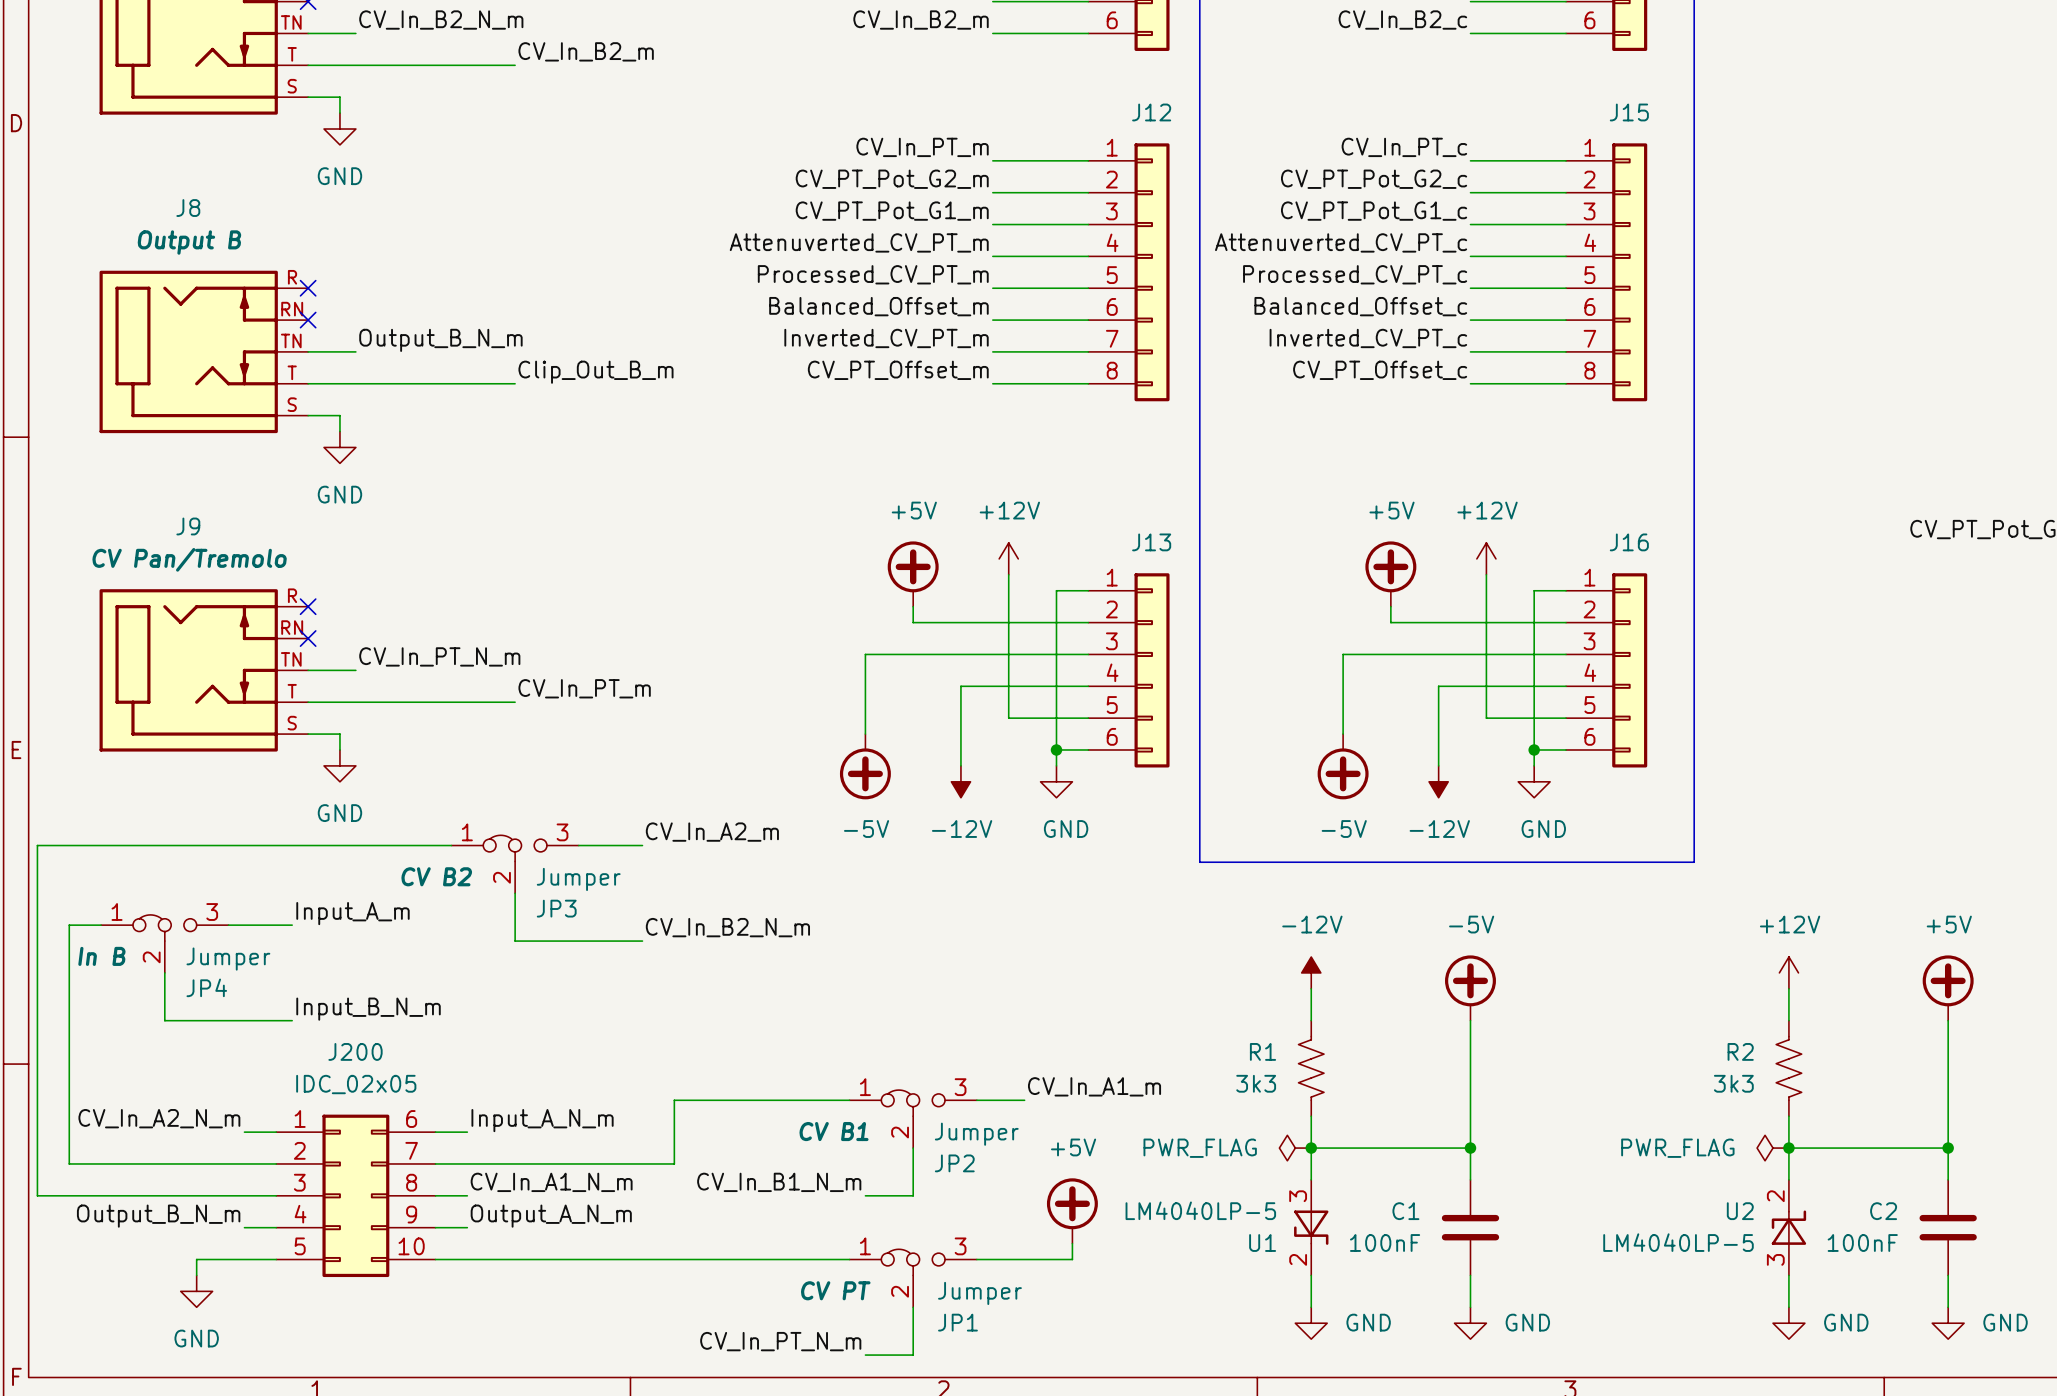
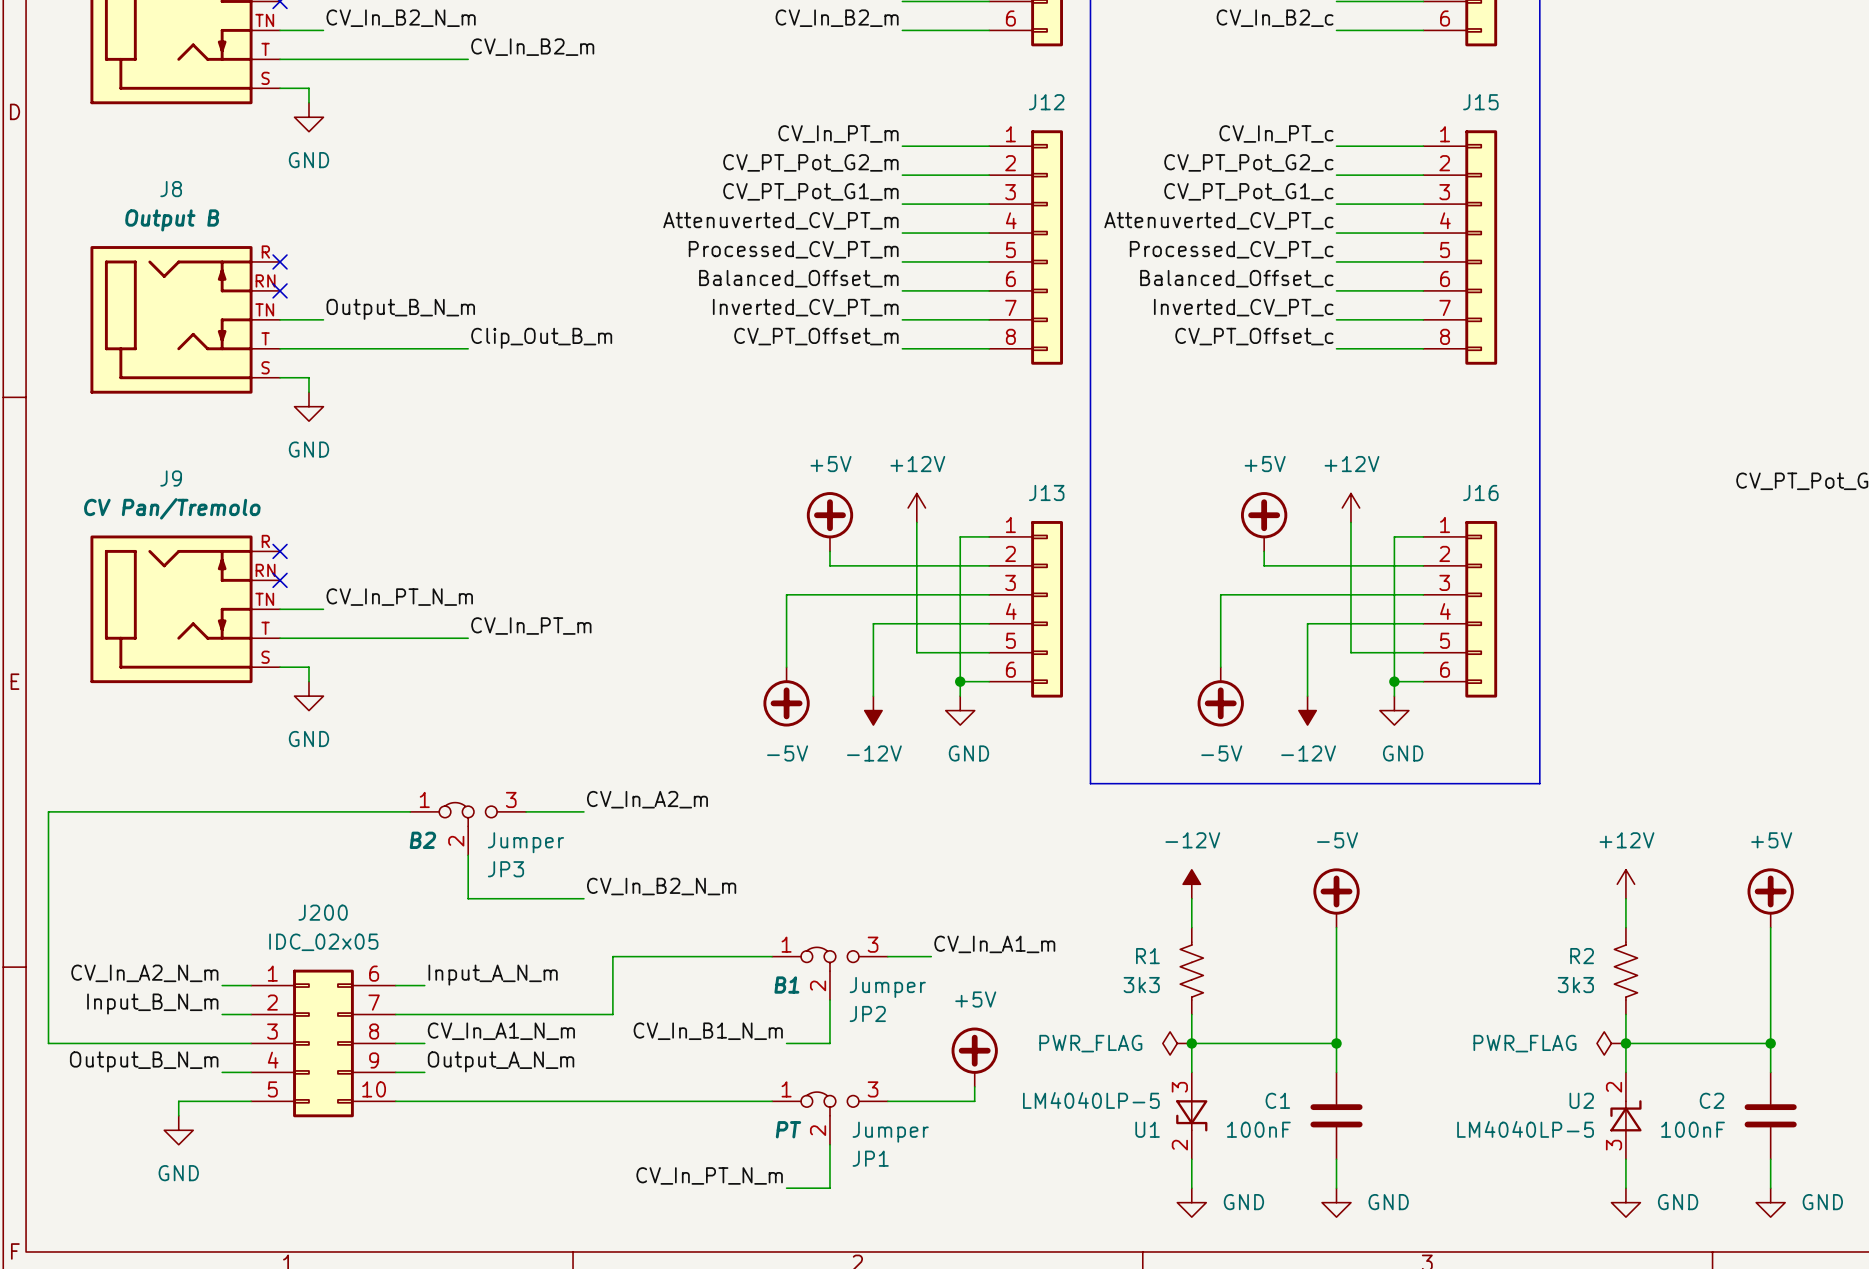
label position: CV_In_A2_m (712, 832) -> CV_In_A2_m (647, 799)
wire: (451, 845) (37, 845) (37, 1195) (276, 1195) -> none
wire: (578, 845) (642, 845) -> (526, 811) (583, 811)
JP3 position: (515, 864) -> (468, 828)
JP3 text: CV B2 (436, 876) -> B2 (422, 840)
wire: none -> (410, 811) (48, 811) (48, 1043) (251, 1043)
wire: (515, 893) (515, 941) (642, 941) -> (468, 855) (468, 898) (583, 898)
label: Input_A_m (352, 913) -> none
wire: (101, 925) (69, 925) (69, 1163) (276, 1163) -> none
wire: (228, 925) (292, 925) -> none
label position: CV_In_B2_N_m (727, 927) -> CV_In_B2_N_m (661, 886)
JP4: Jumper (164, 943) -> none
wire: (164, 972) (164, 1020) (292, 1020) -> none
label position: Input_B_N_m (368, 1009) -> Input_B_N_m (152, 1004)
label position: CV_In_A1_m (1094, 1086) -> CV_In_A1_m (994, 944)
wire: (674, 1100) (849, 1100) -> (612, 1000) (612, 956) (772, 956)
wire: (976, 1100) (1024, 1100) -> (887, 956) (931, 956)
wire: none -> (222, 1014) (251, 1014)
wire: (674, 1116) (674, 1163) (435, 1163) -> (612, 1014) (395, 1014)
label position: CV_In_A2_N_m (159, 1118) -> CV_In_A2_N_m (144, 973)
JP2 position: (913, 1119) -> (829, 973)
label position: Input_A_N_m (542, 1120) -> Input_A_N_m (493, 975)
JP2 text: CV B1 (834, 1131) -> B1 (786, 985)
wire: (244, 1132) (276, 1132) -> (222, 985) (251, 985)
wire: (435, 1132) (467, 1132) -> (395, 985) (424, 985)
wire: (913, 1148) (913, 1195) (865, 1195) -> (829, 1000) (829, 1043) (786, 1043)
label position: CV_In_A1_N_m (551, 1182) -> CV_In_A1_N_m (501, 1031)
label position: CV_In_B1_N_m (779, 1182) -> CV_In_B1_N_m (708, 1031)
J200 position: (355, 1195) -> (323, 1043)
wire: (435, 1195) (467, 1195) -> (395, 1043) (424, 1043)
power symbol position: +5V (1072, 1210) -> +5V (974, 1057)
label position: Output_B_N_m (158, 1216) -> Output_B_N_m (144, 1061)
label position: Output_A_N_m (551, 1216) -> Output_A_N_m (501, 1061)
wire: (244, 1227) (276, 1227) -> (222, 1072) (251, 1072)
wire: (435, 1227) (467, 1227) -> (395, 1072) (424, 1072)
wire: (1072, 1243) (1072, 1259) (976, 1259) -> (974, 1086) (974, 1101) (887, 1101)
wire: (276, 1259) (196, 1259) (196, 1275) -> (251, 1101) (178, 1101) (178, 1115)
wire: (435, 1259) (849, 1259) -> (395, 1101) (772, 1101)
JP1 position: (913, 1278) -> (829, 1118)
JP1 text: CV PT (835, 1290) -> PT (788, 1129)
power symbol position: GND (196, 1291) -> GND (178, 1130)
wire: (913, 1307) (913, 1355) (865, 1355) -> (829, 1144) (829, 1188) (786, 1188)
label position: CV_In_PT_N_m (780, 1341) -> CV_In_PT_N_m (709, 1175)

